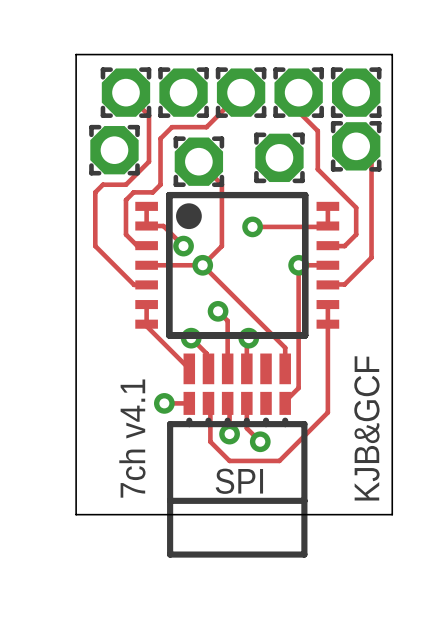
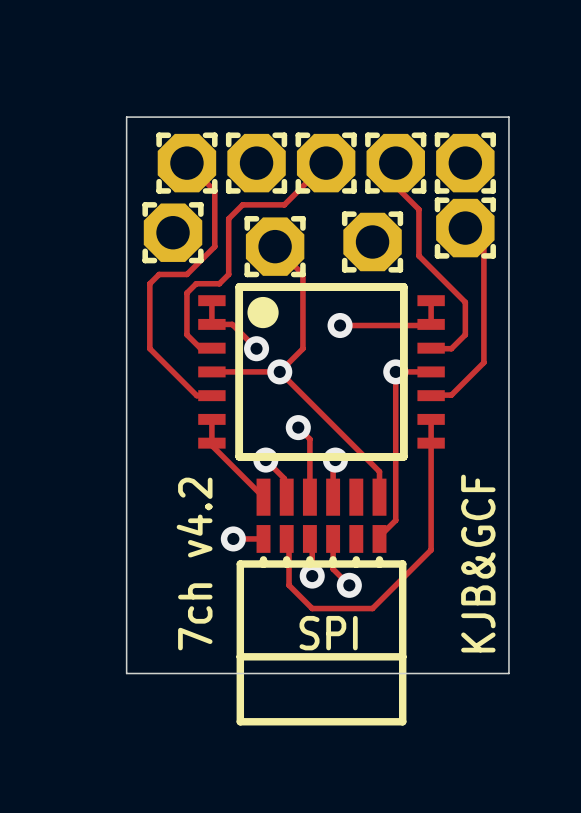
text: 7ch v4.1 (132, 438) -> 7ch v4.2 (194, 564)

